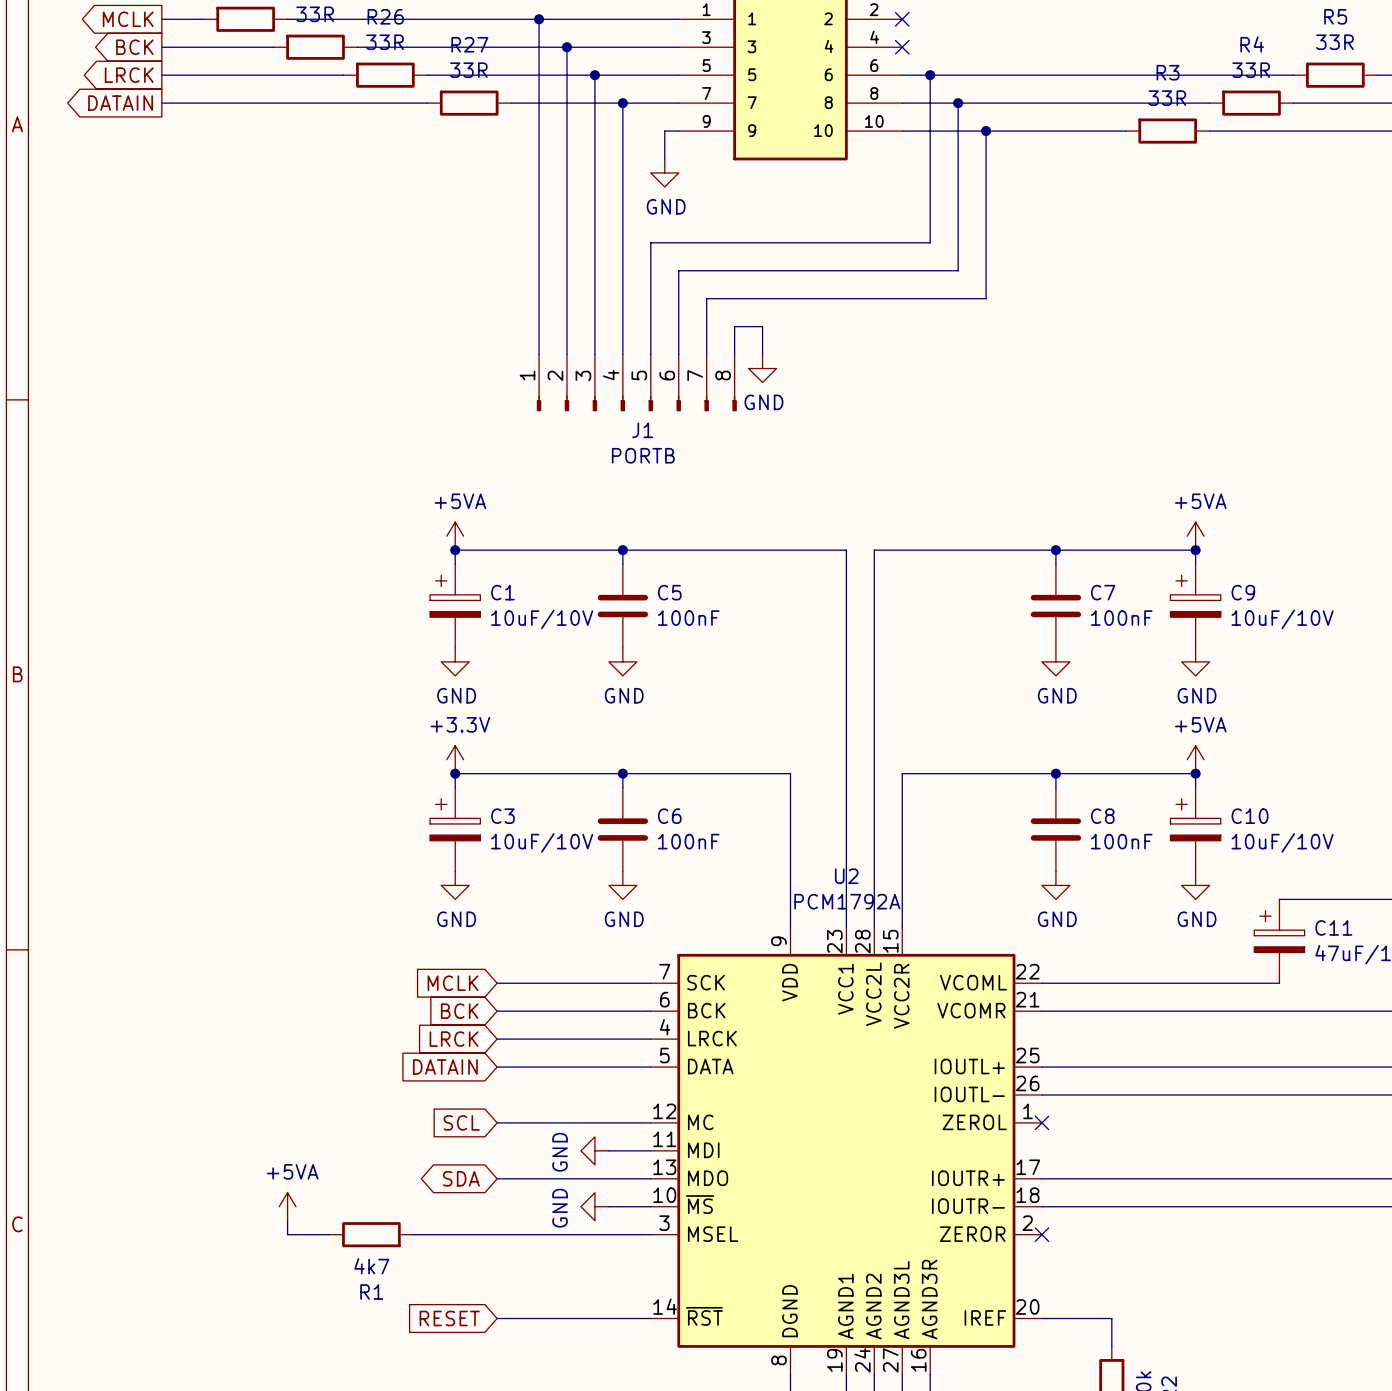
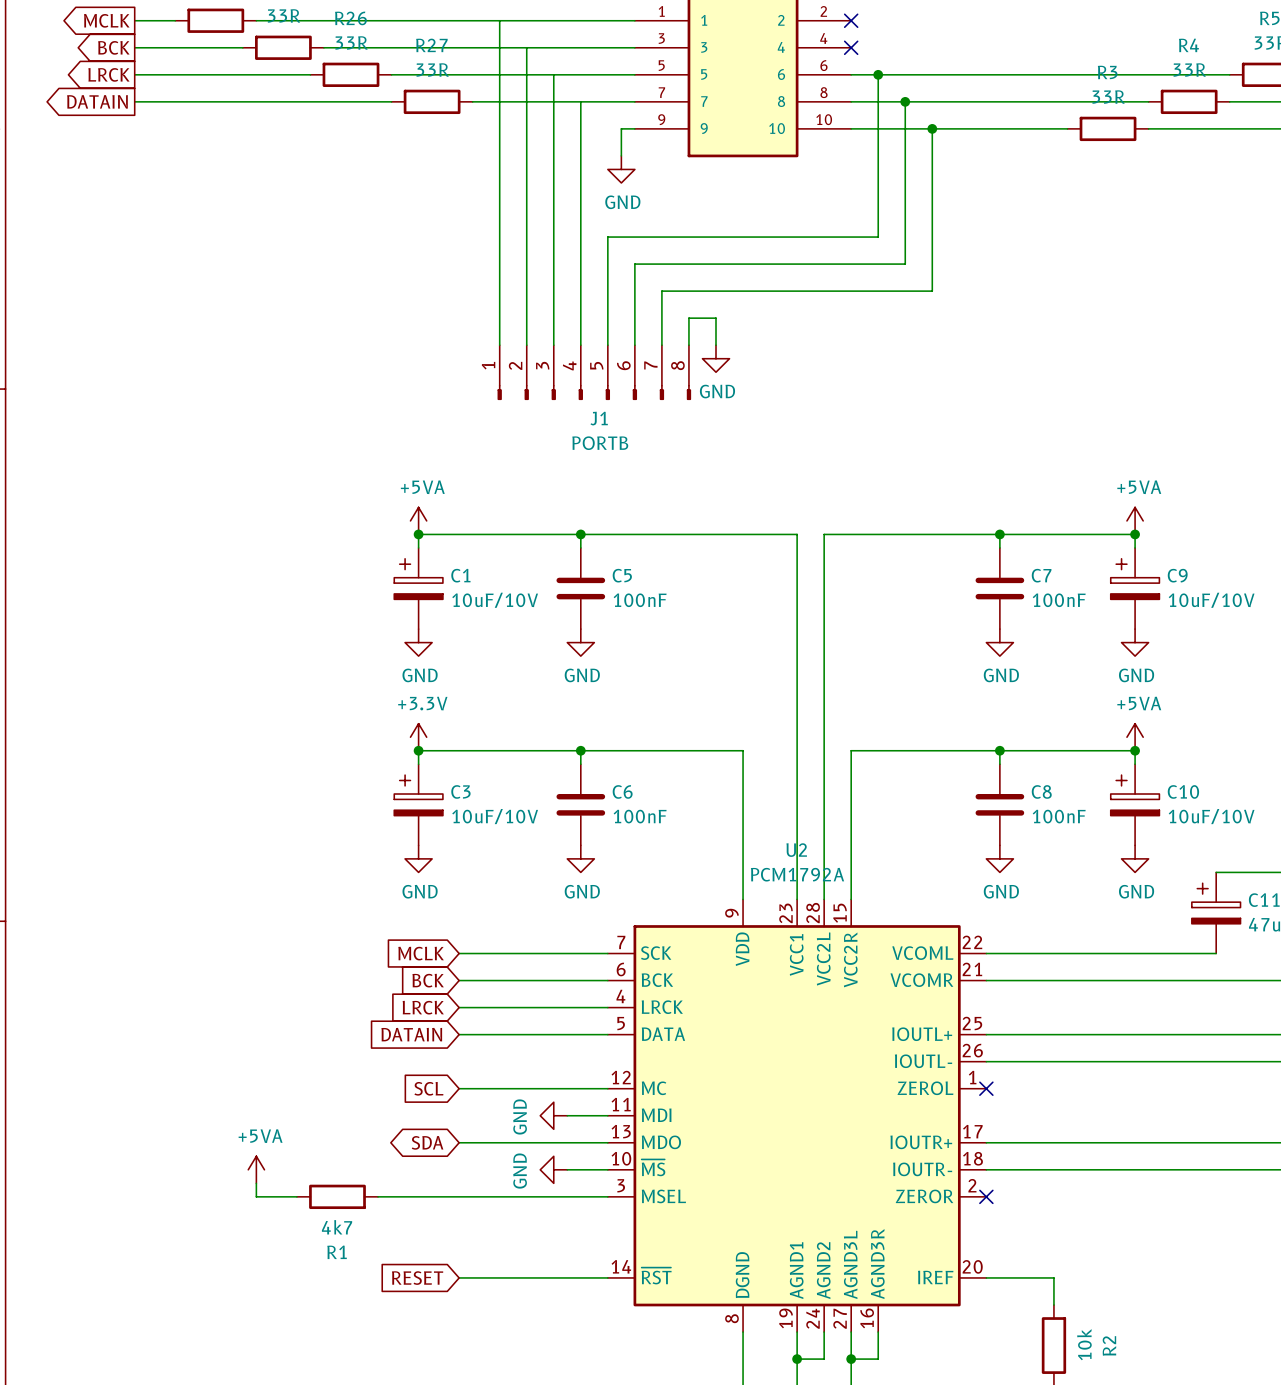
junction: (539, 19) -> none
junction: (566, 47) -> none
junction: (594, 75) -> none
junction: (622, 103) -> none

